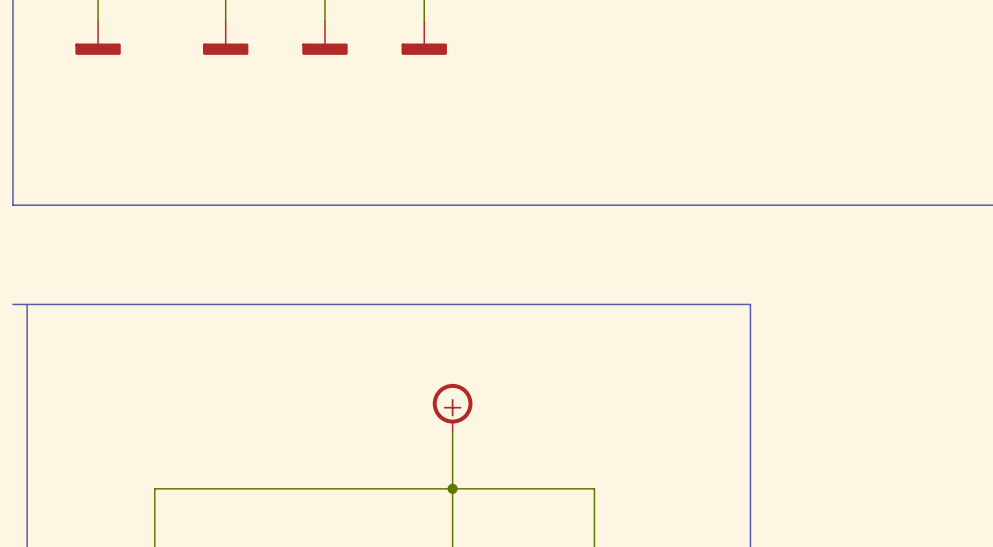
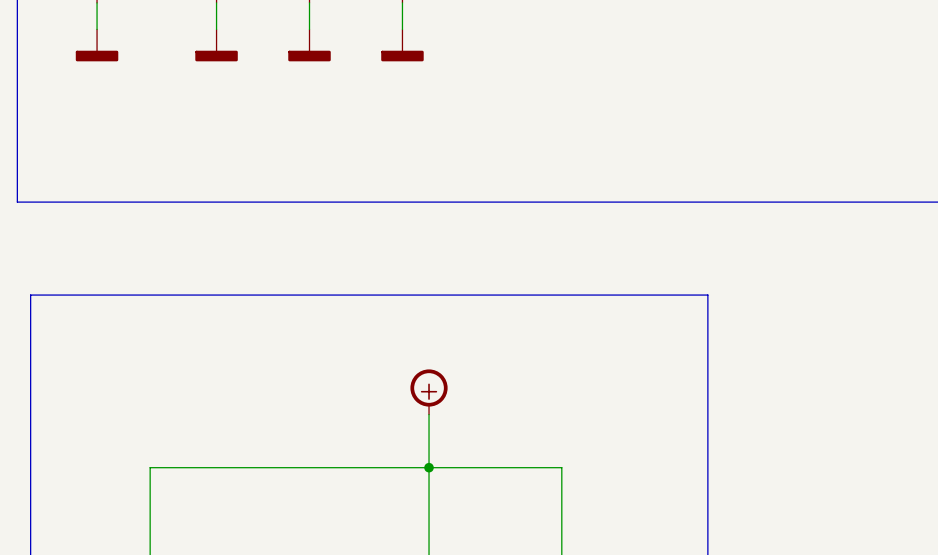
line: (12, 304) (27, 304) -> none

